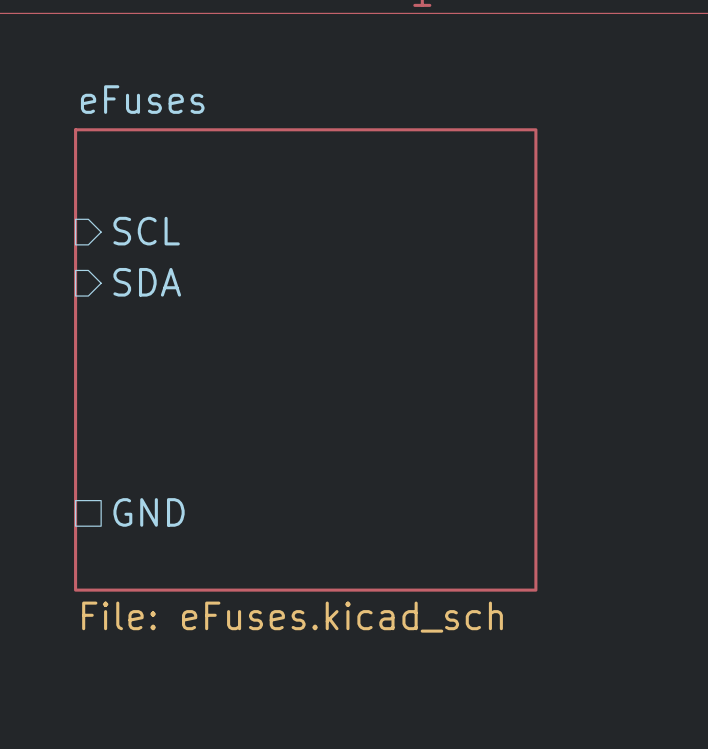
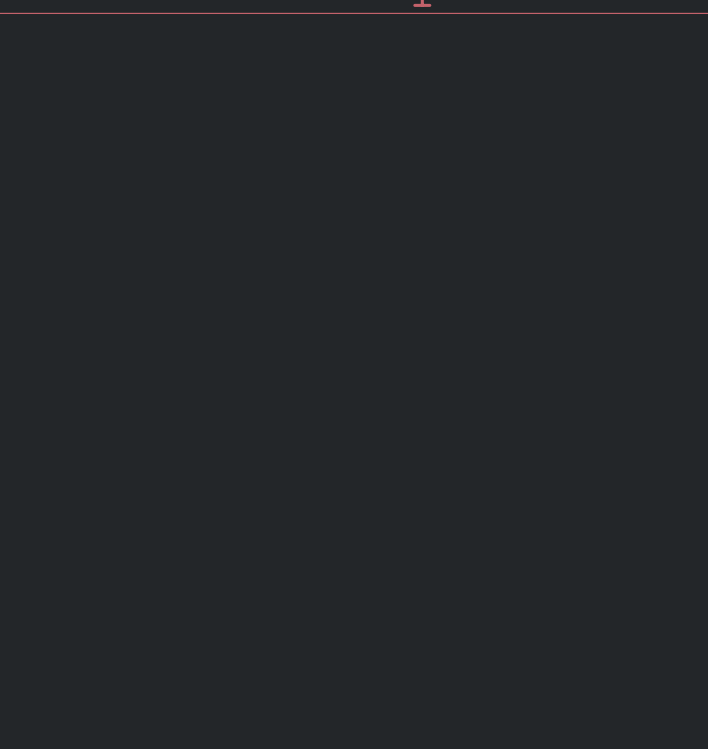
sheet pin: SCL (146, 231) -> none
sheet pin: SDA (147, 282) -> none
sheet eFuses: File: eFuses.kicad_sch (305, 359) -> none
sheet pin: GND (149, 512) -> none

